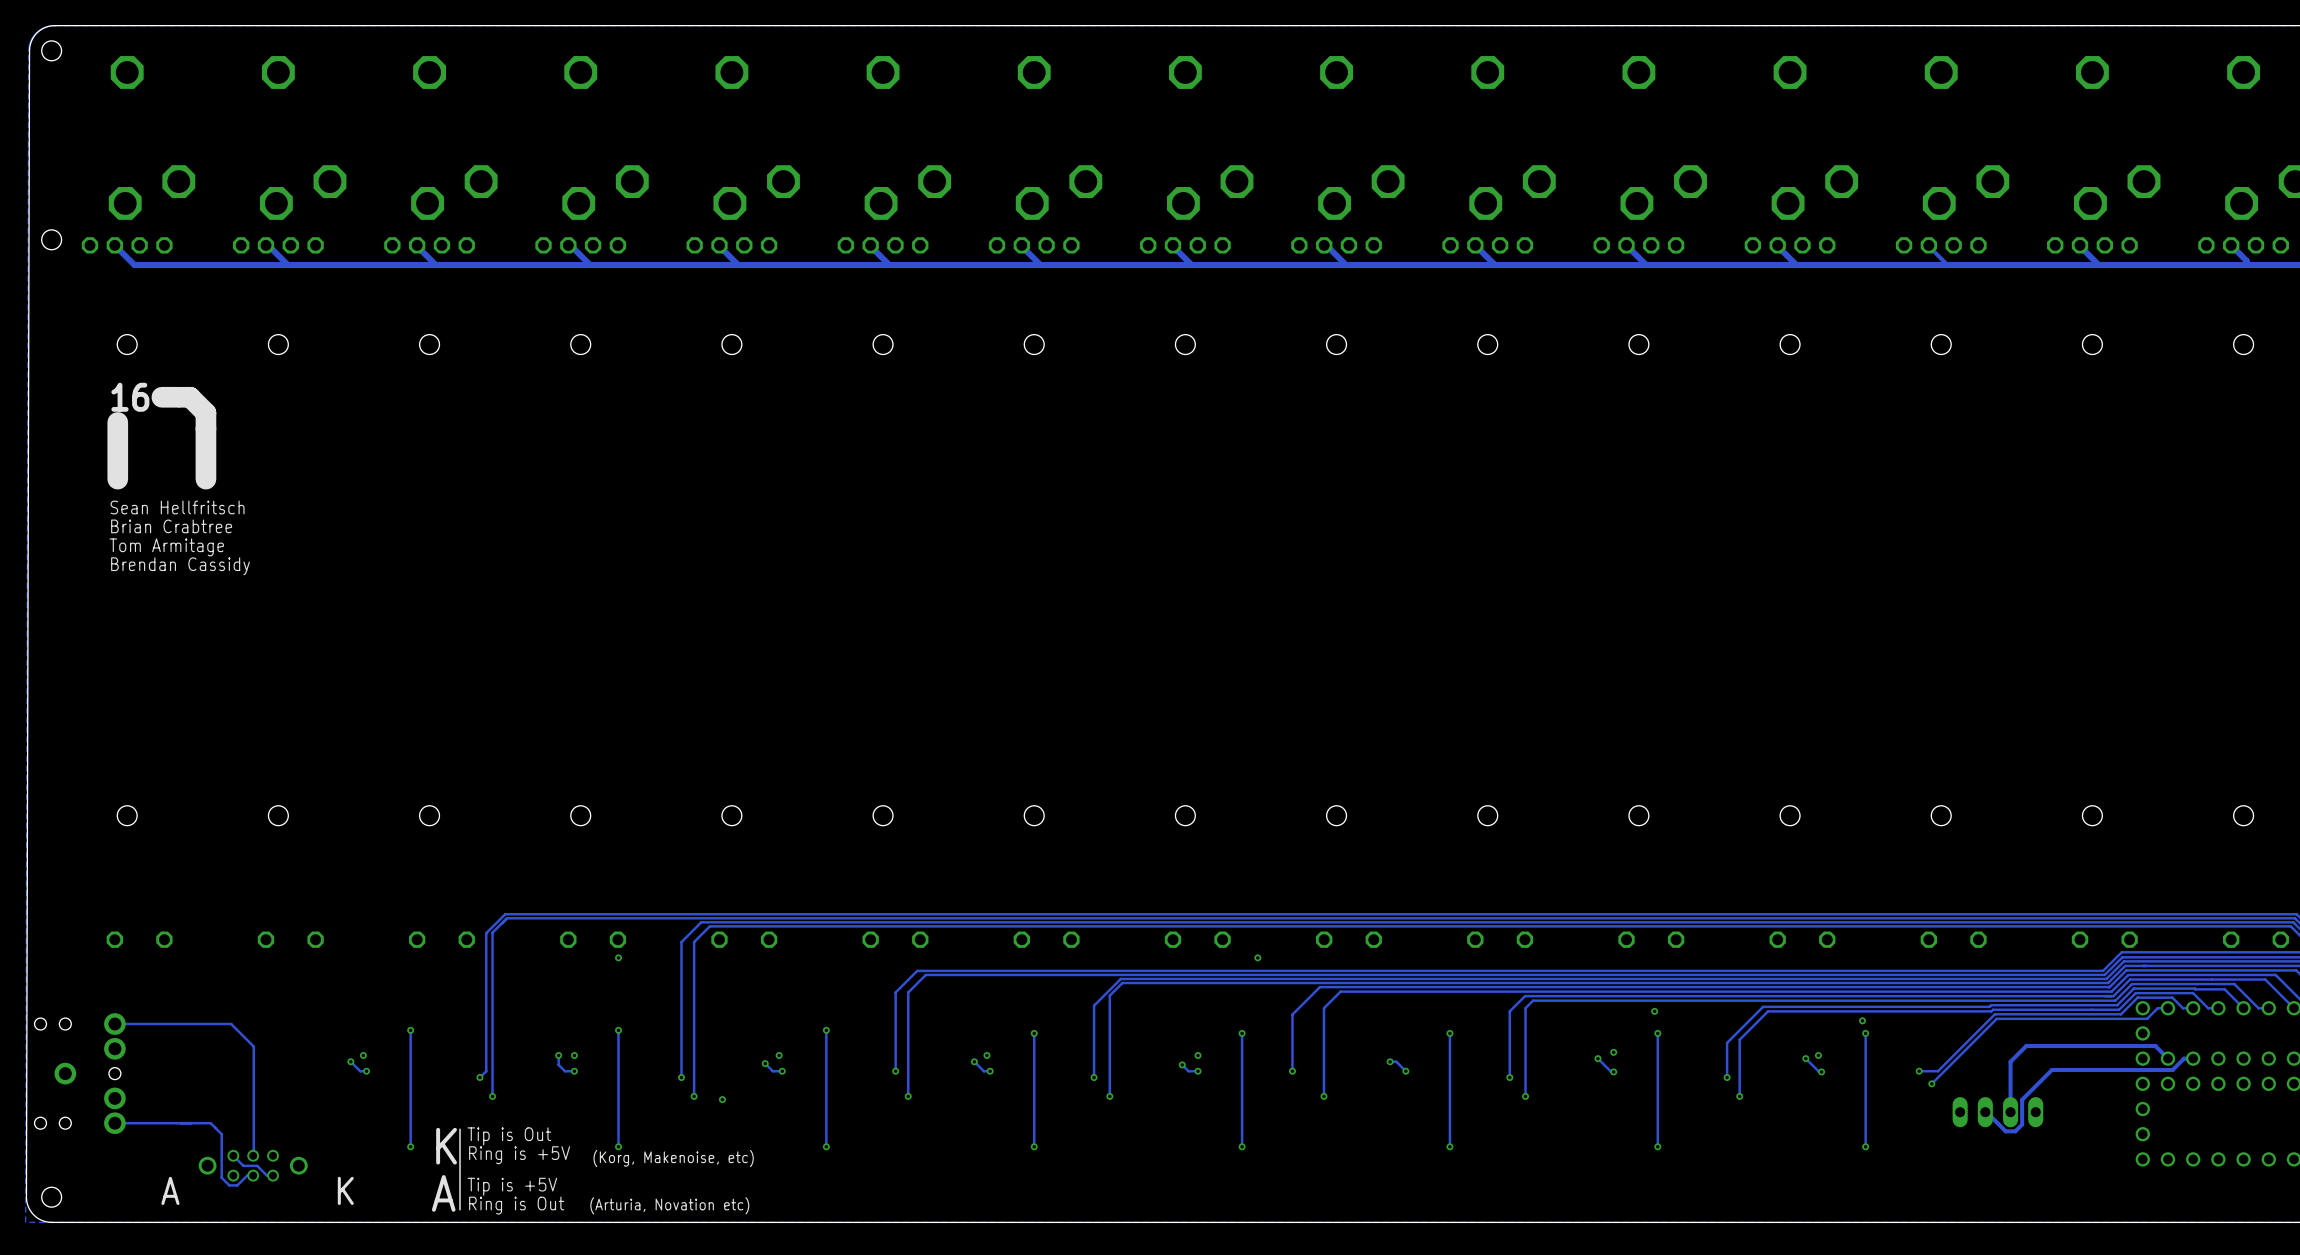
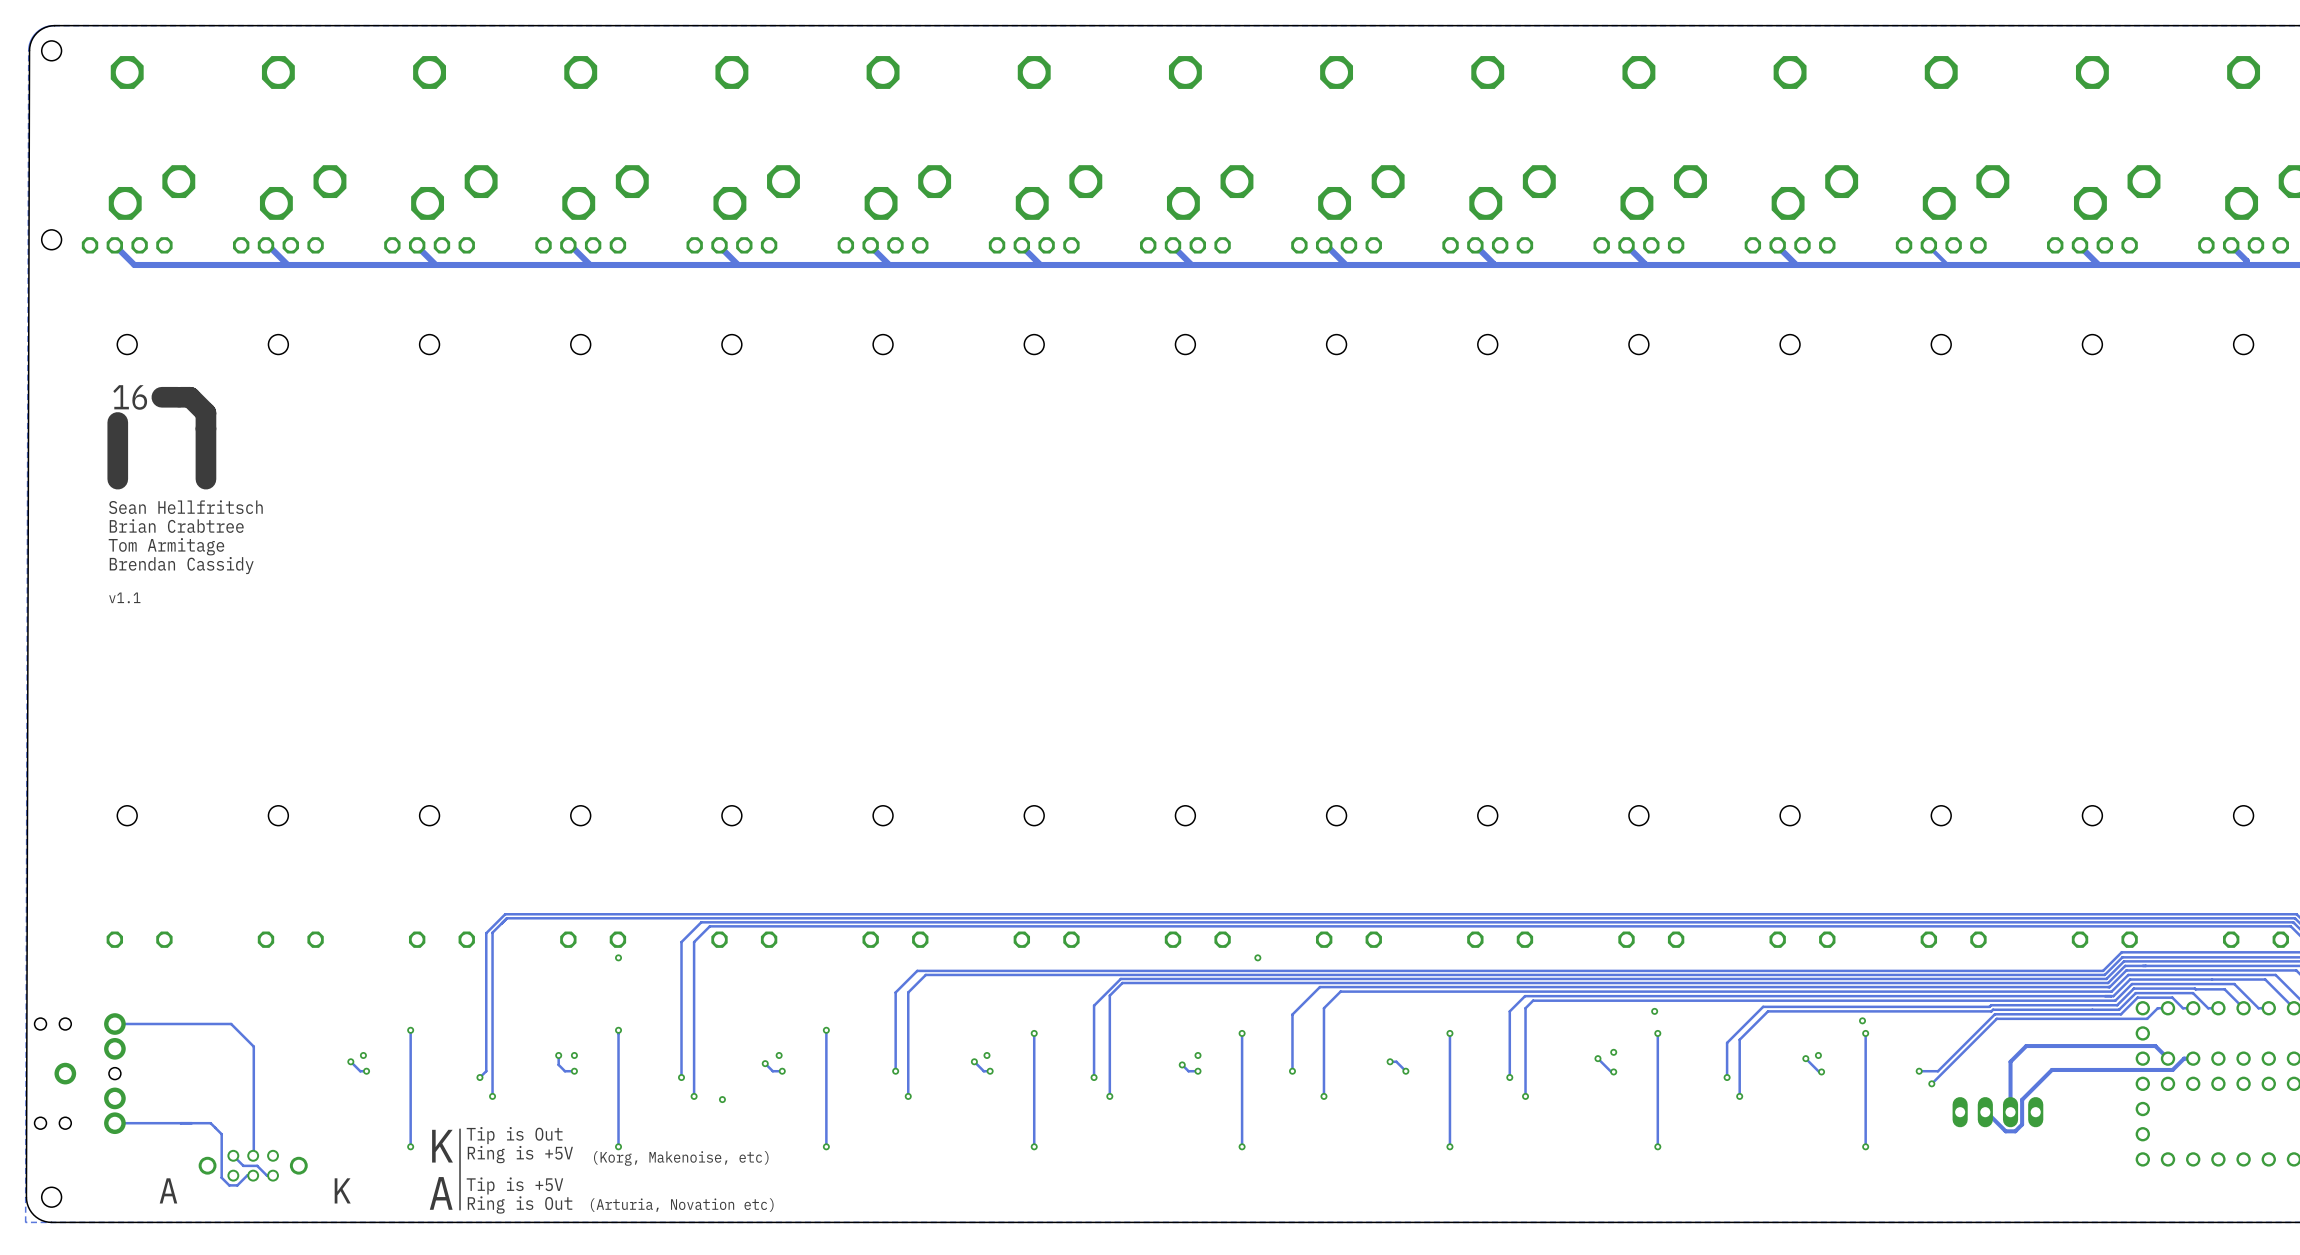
text: none -> v1.1 (124, 597)

